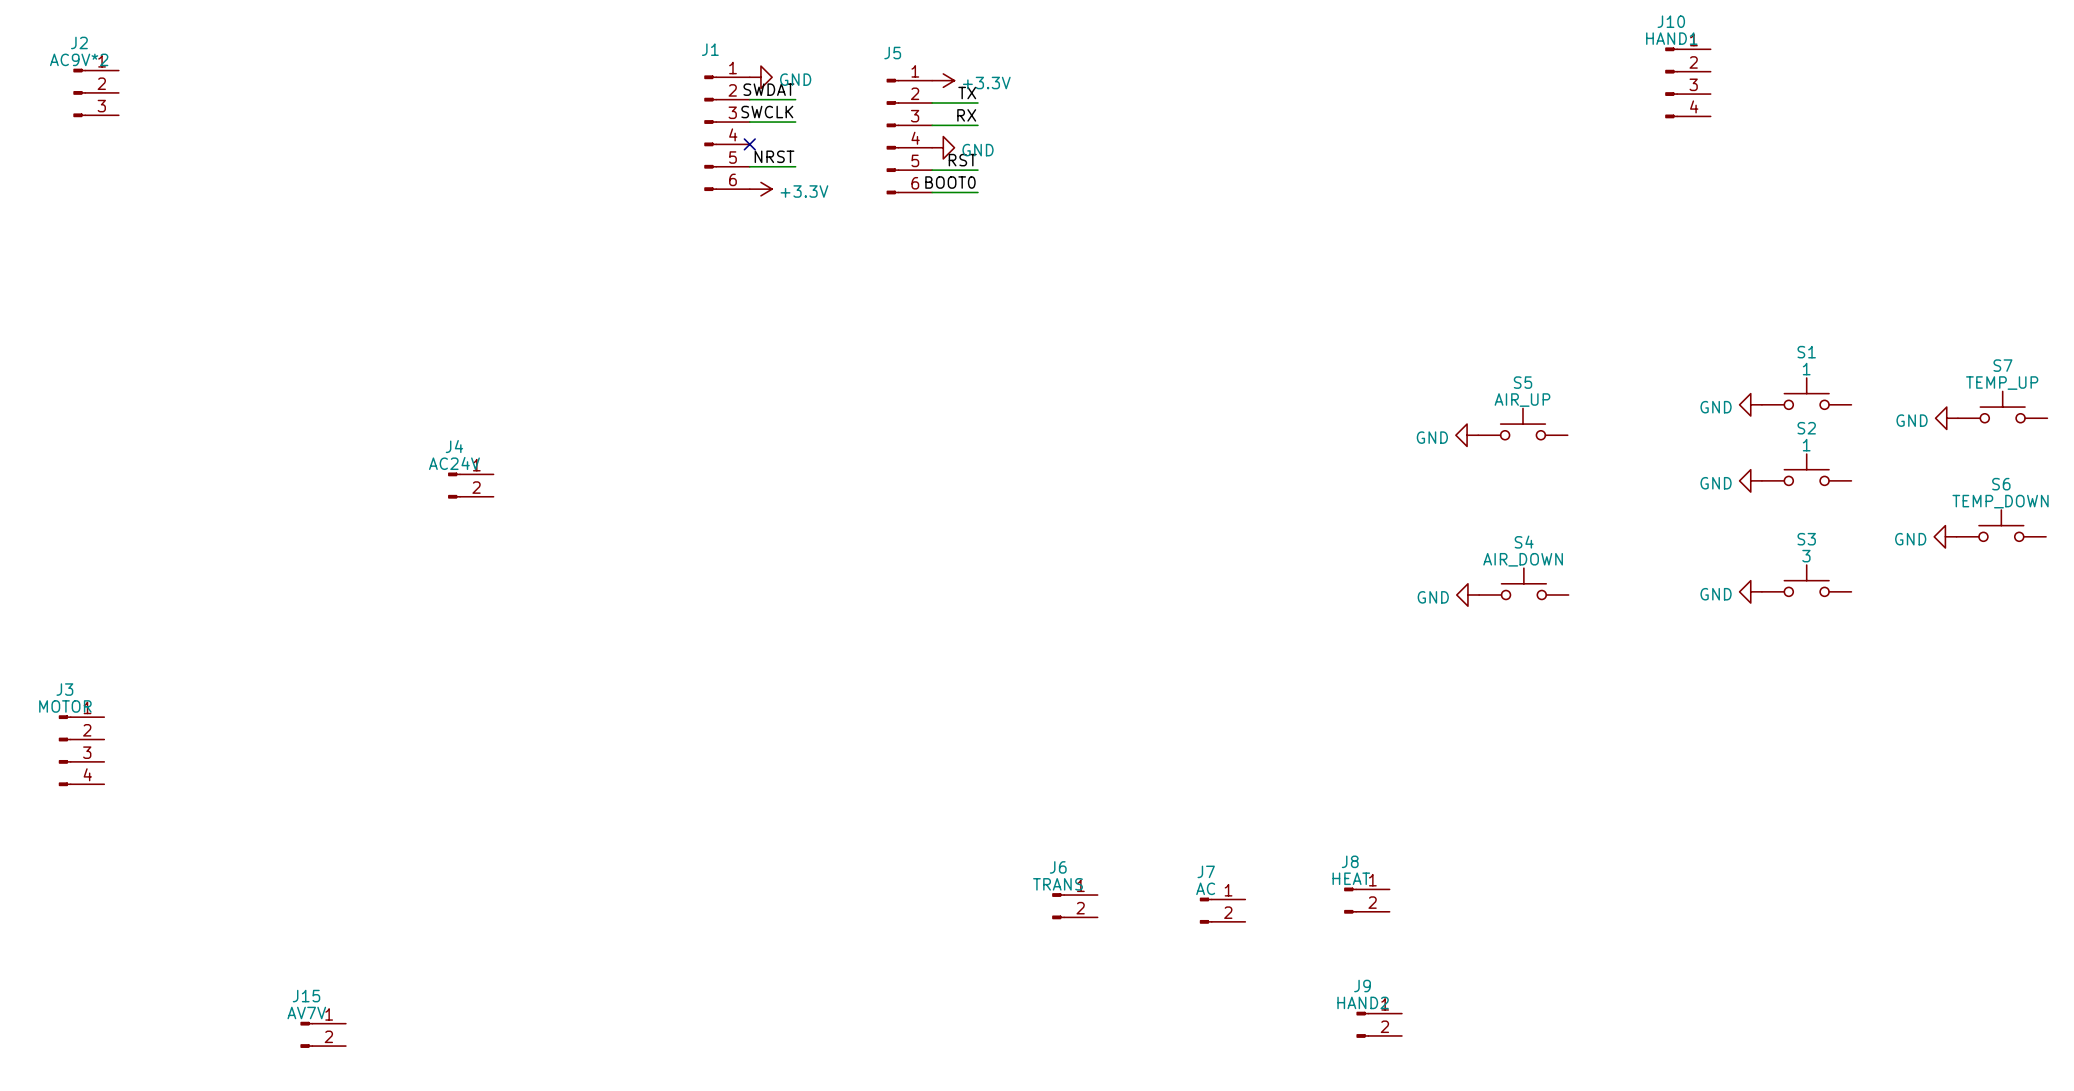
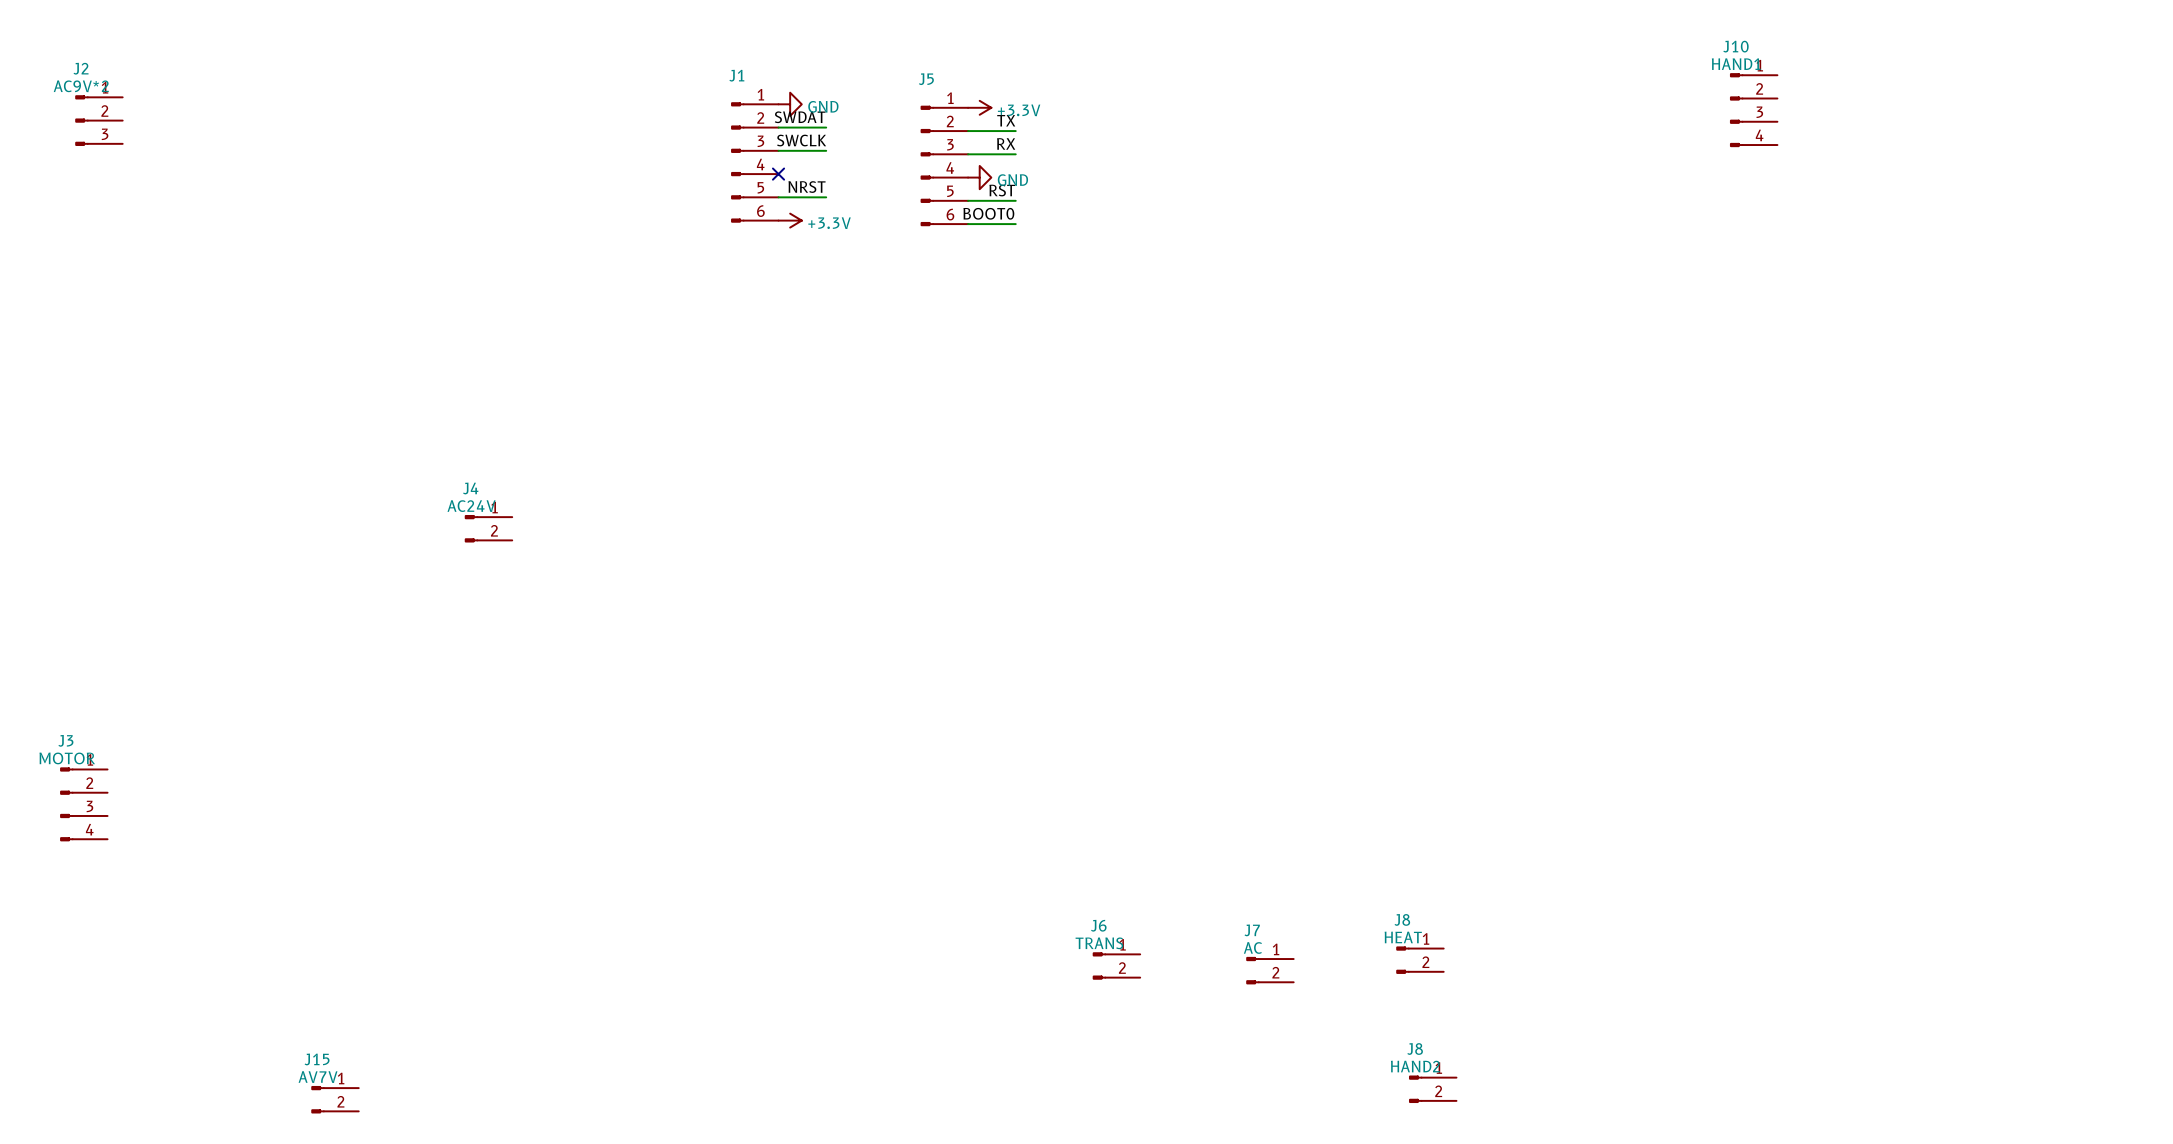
S1: 1 (1806, 393) -> none
power symbol: GND (1750, 404) -> none
S7: TEMP_UP (2002, 407) -> none
power symbol: GND (1946, 418) -> none
S5: AIR_UP (1523, 424) -> none
power symbol: GND (1467, 435) -> none
S2: 1 (1806, 469) -> none
power symbol: GND (1750, 480) -> none
S6: TEMP_DOWN (2001, 525) -> none
power symbol: GND (1945, 536) -> none
S3: 3 (1806, 580) -> none
S4: AIR_DOWN (1523, 583) -> none
power symbol: GND (1750, 591) -> none
power symbol: GND (1467, 594) -> none
J9 name: J9 (1362, 986) -> J8 (1415, 1049)

